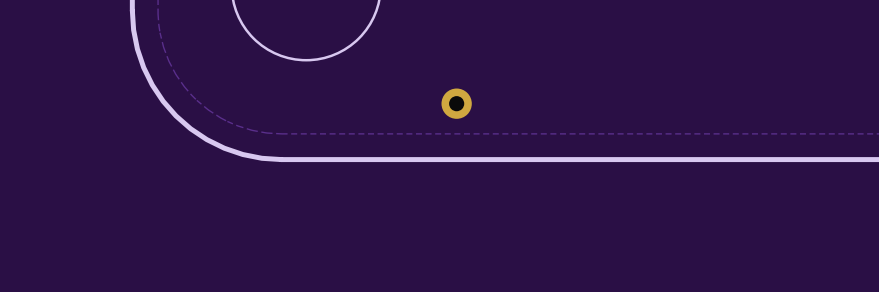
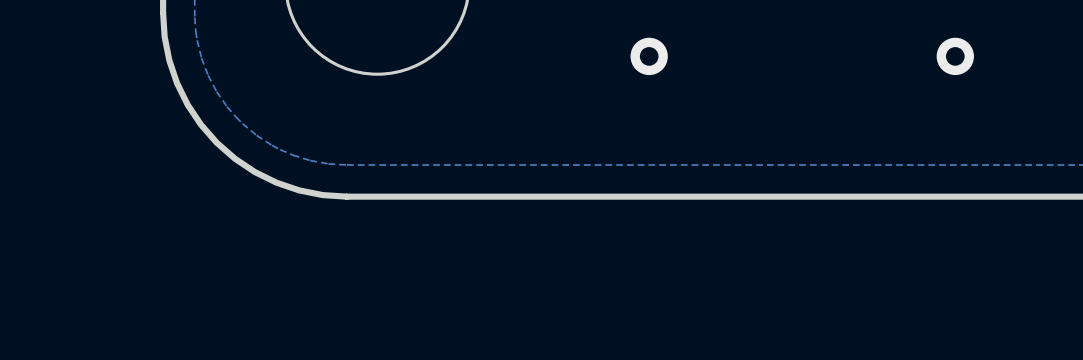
via: none -> (649, 56)
via: none -> (955, 56)
via: (456, 103) -> none

